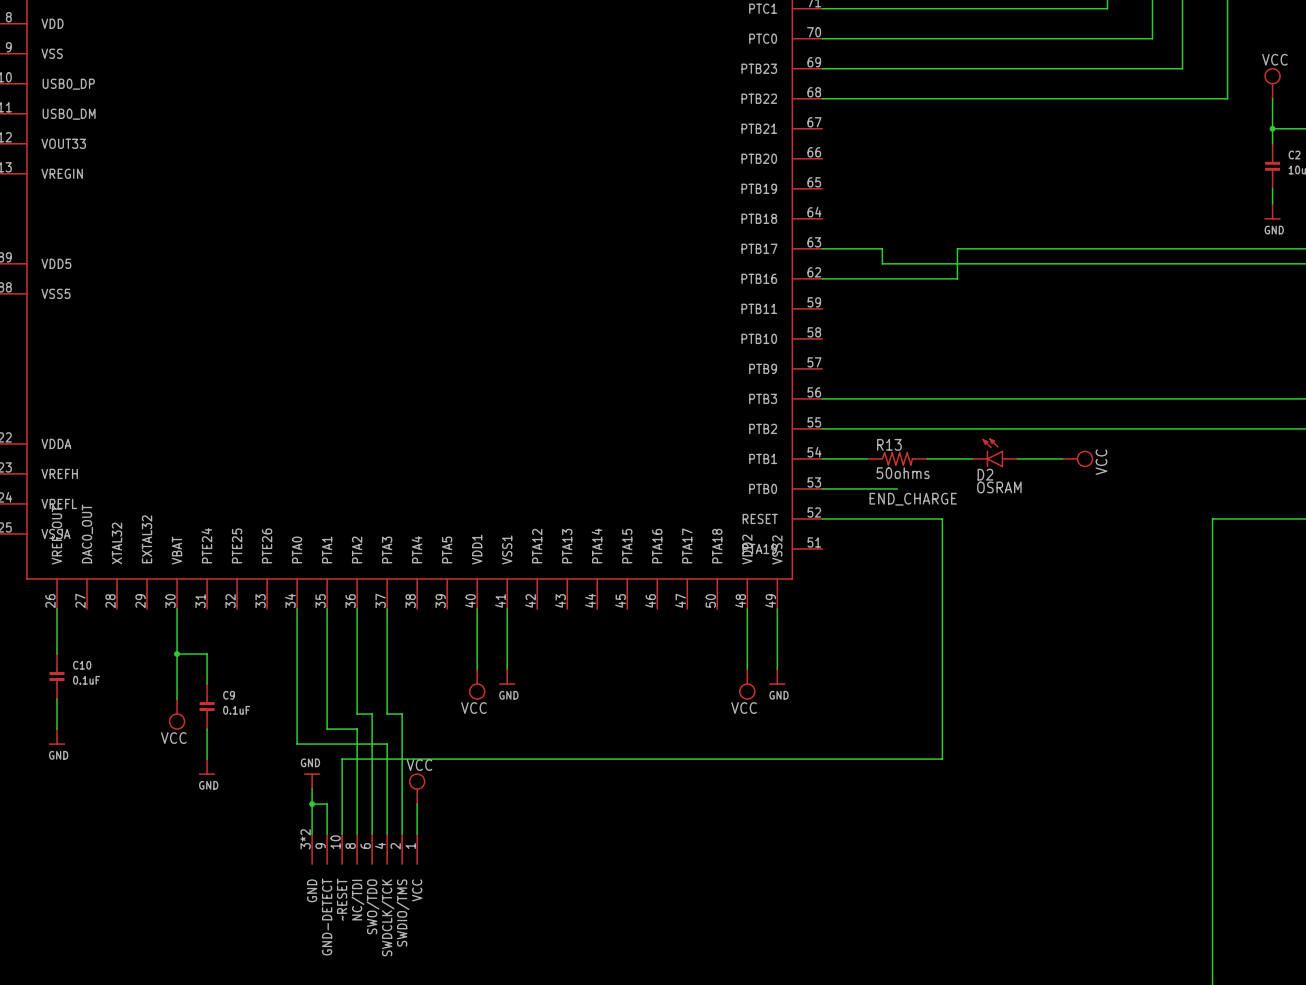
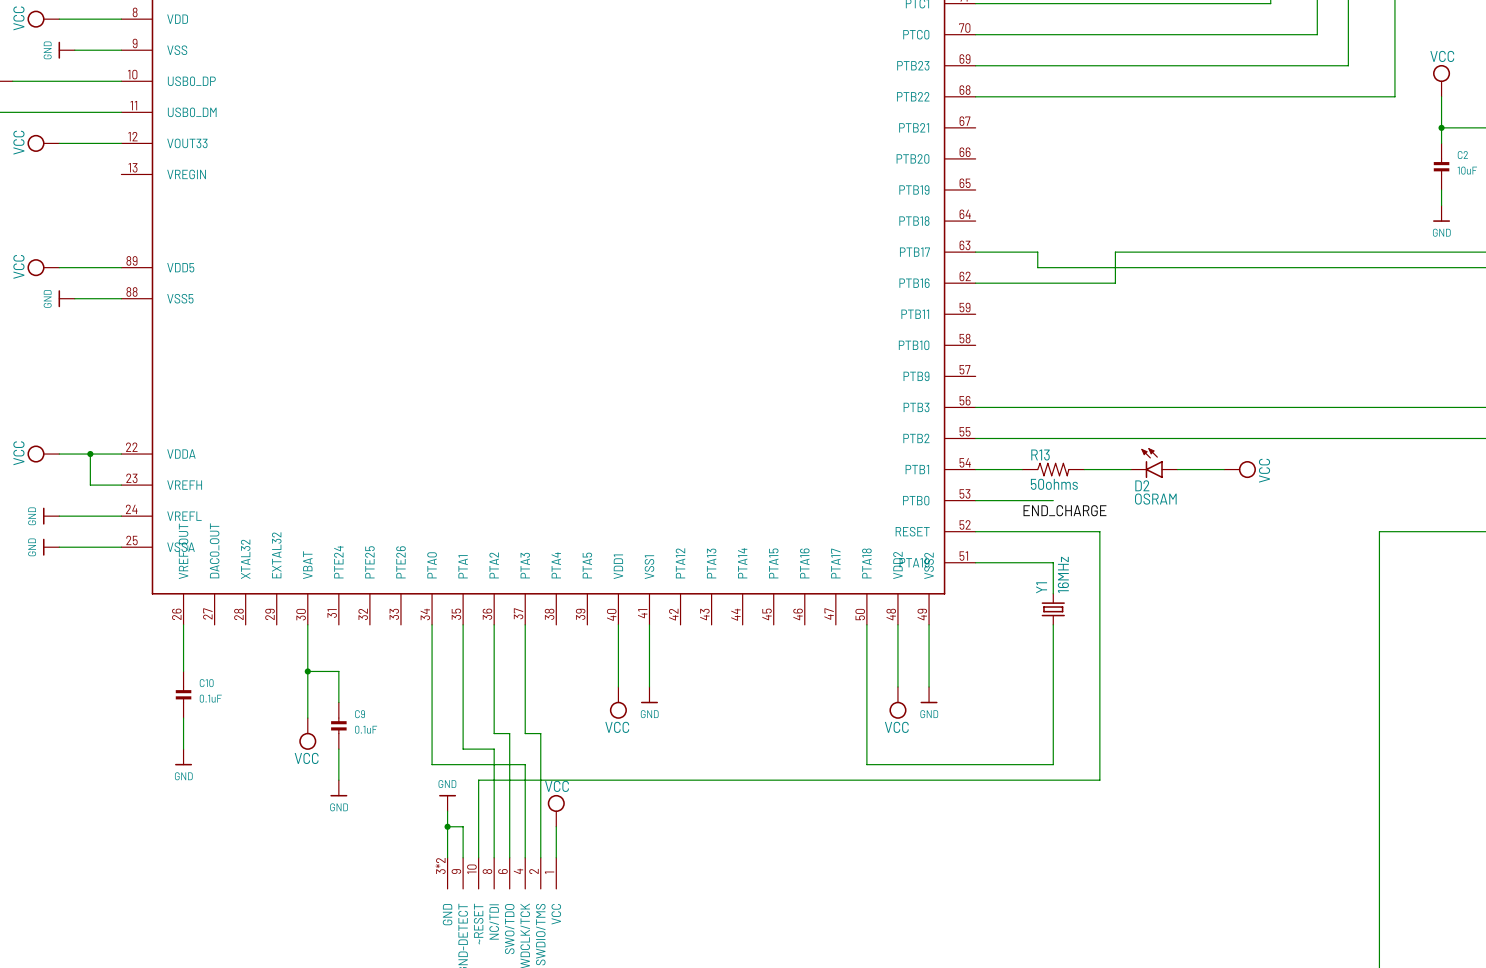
wire: none -> (975, 562) (1053, 562) (1053, 593)
Y1: none -> 16MHz (1053, 609)
wire: none -> (866, 624) (866, 764) (1053, 764) (1053, 624)

